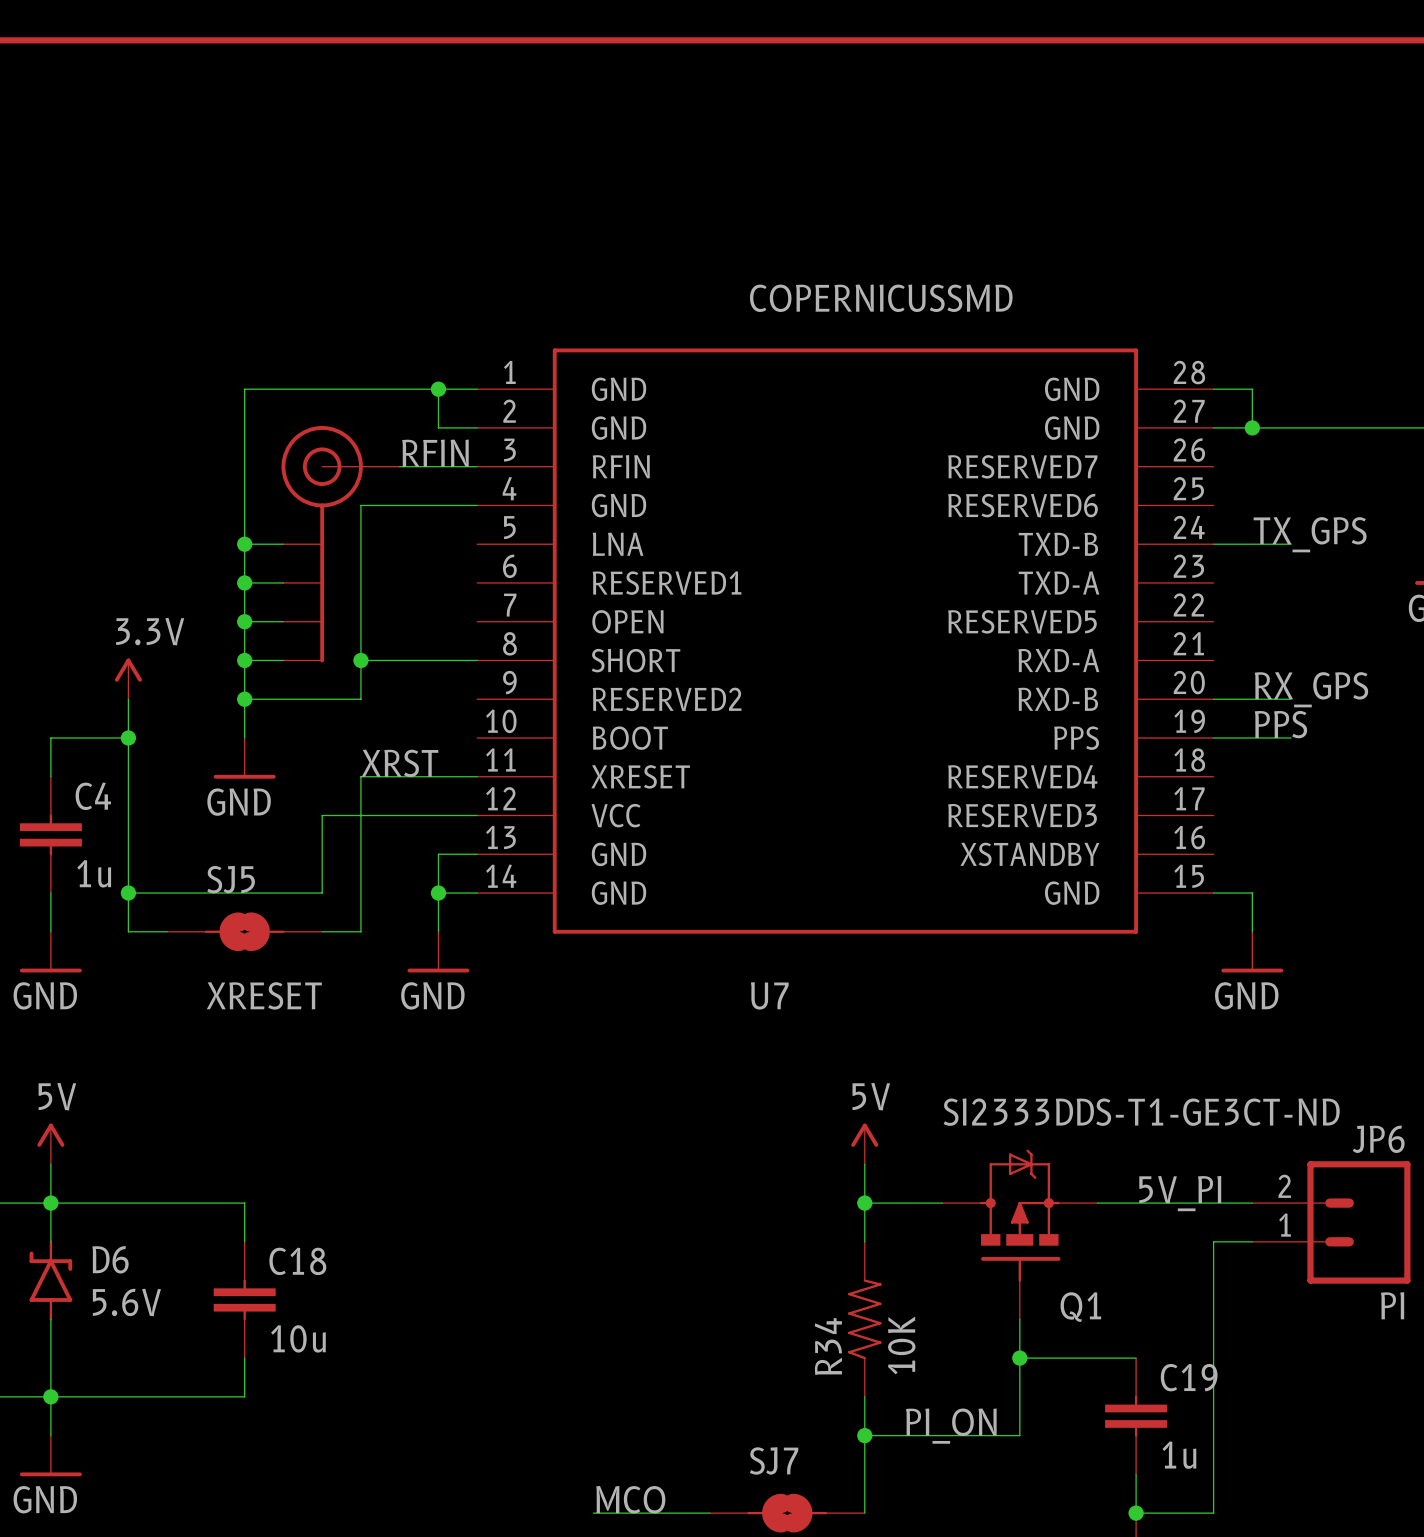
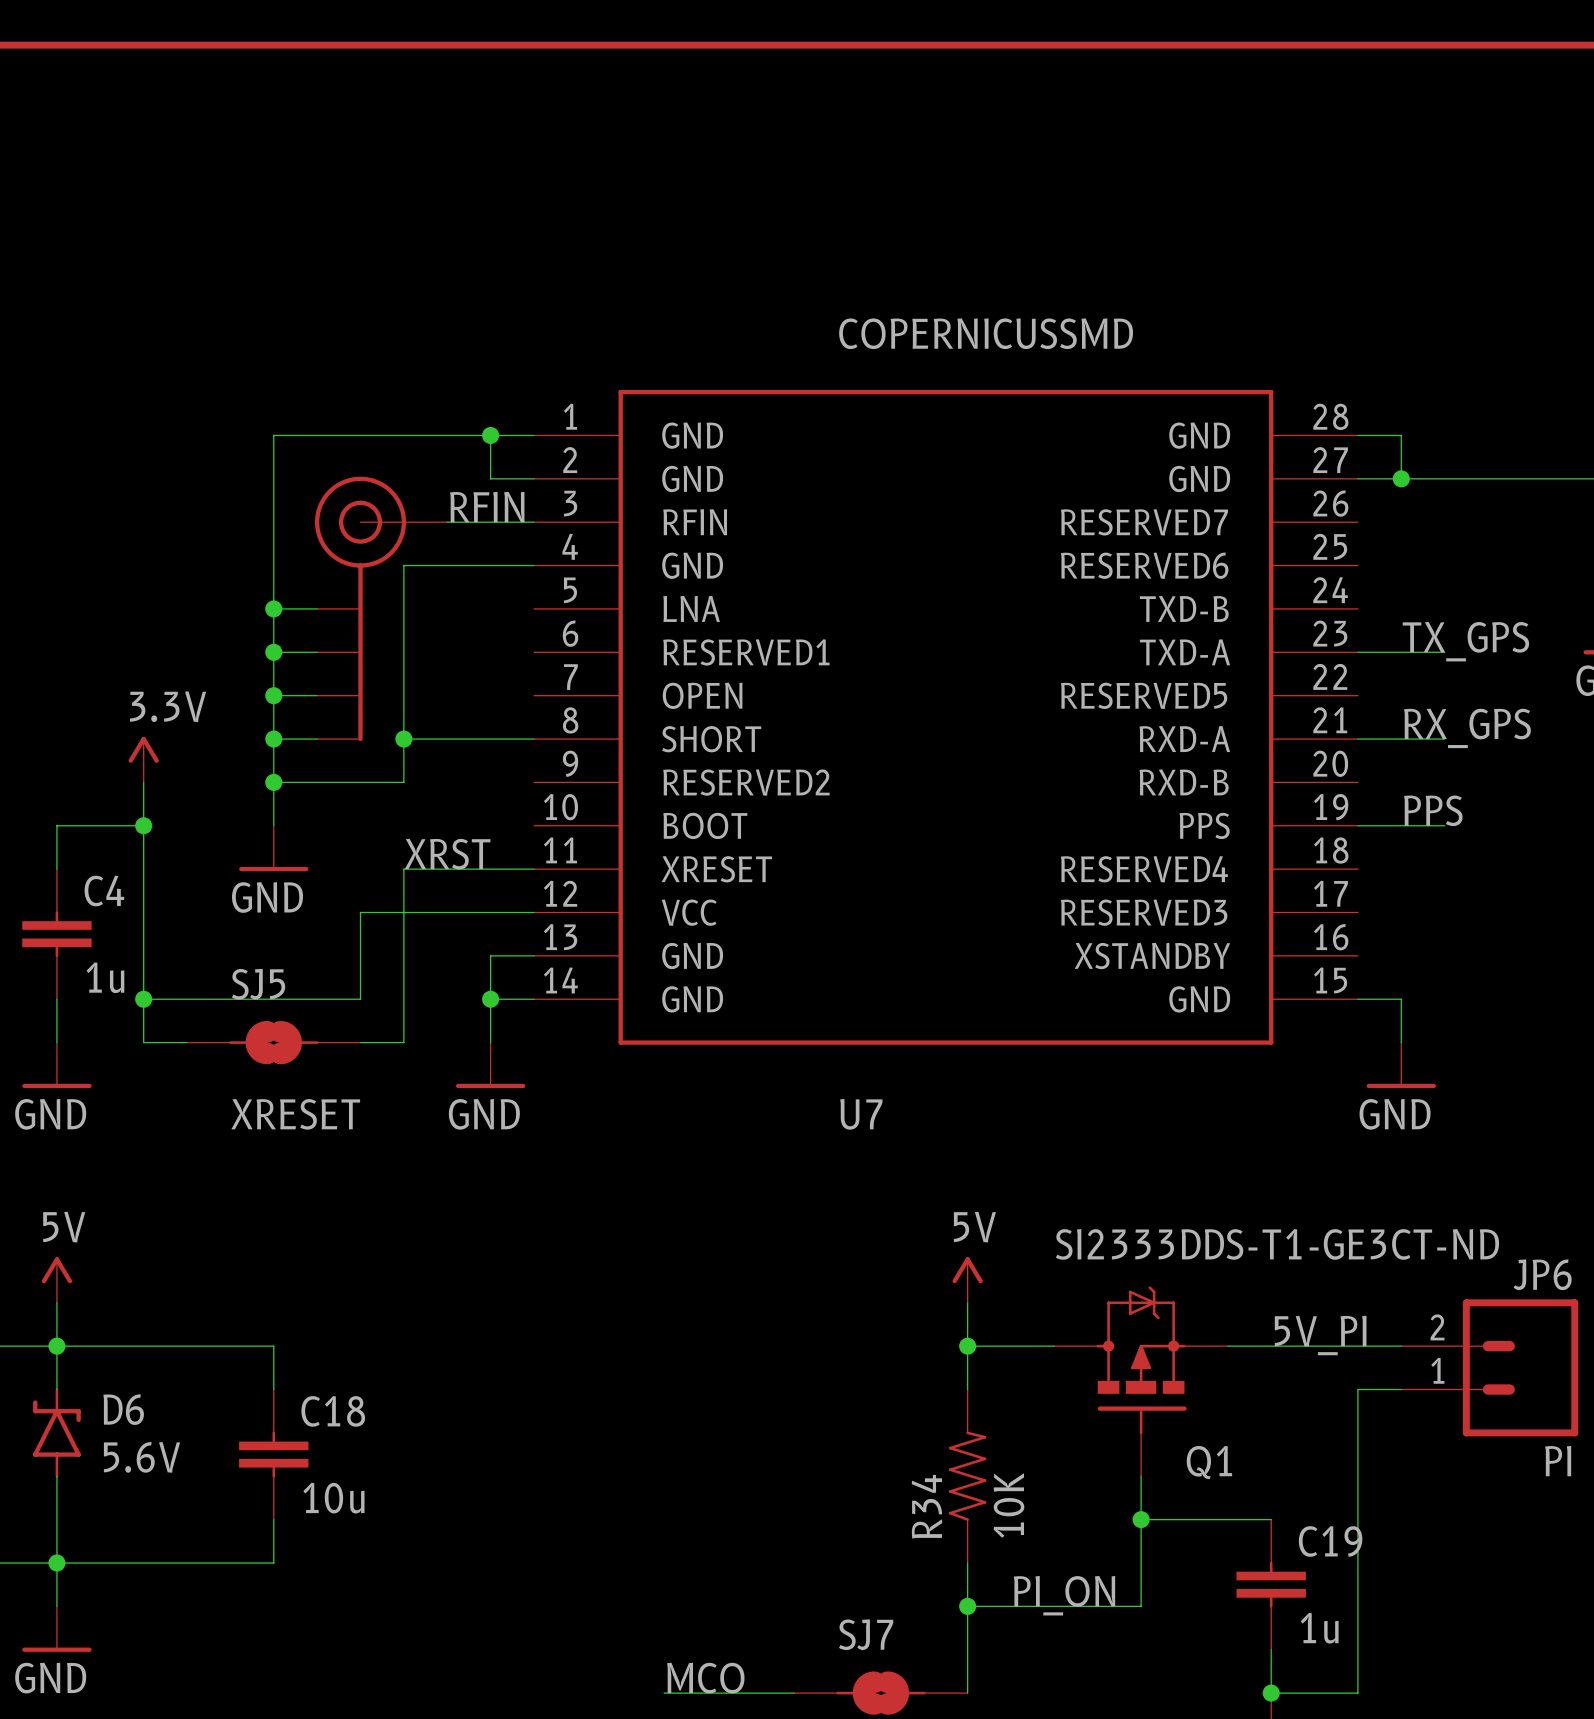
label position: TX_GPS (1310, 534) -> TX_GPS (1465, 641)
wire: (1213, 544) (1291, 544) -> (1357, 652) (1444, 652)
label position: RX_GPS (1311, 689) -> RX_GPS (1467, 728)
wire: (1213, 699) (1291, 699) -> (1357, 739) (1444, 739)

